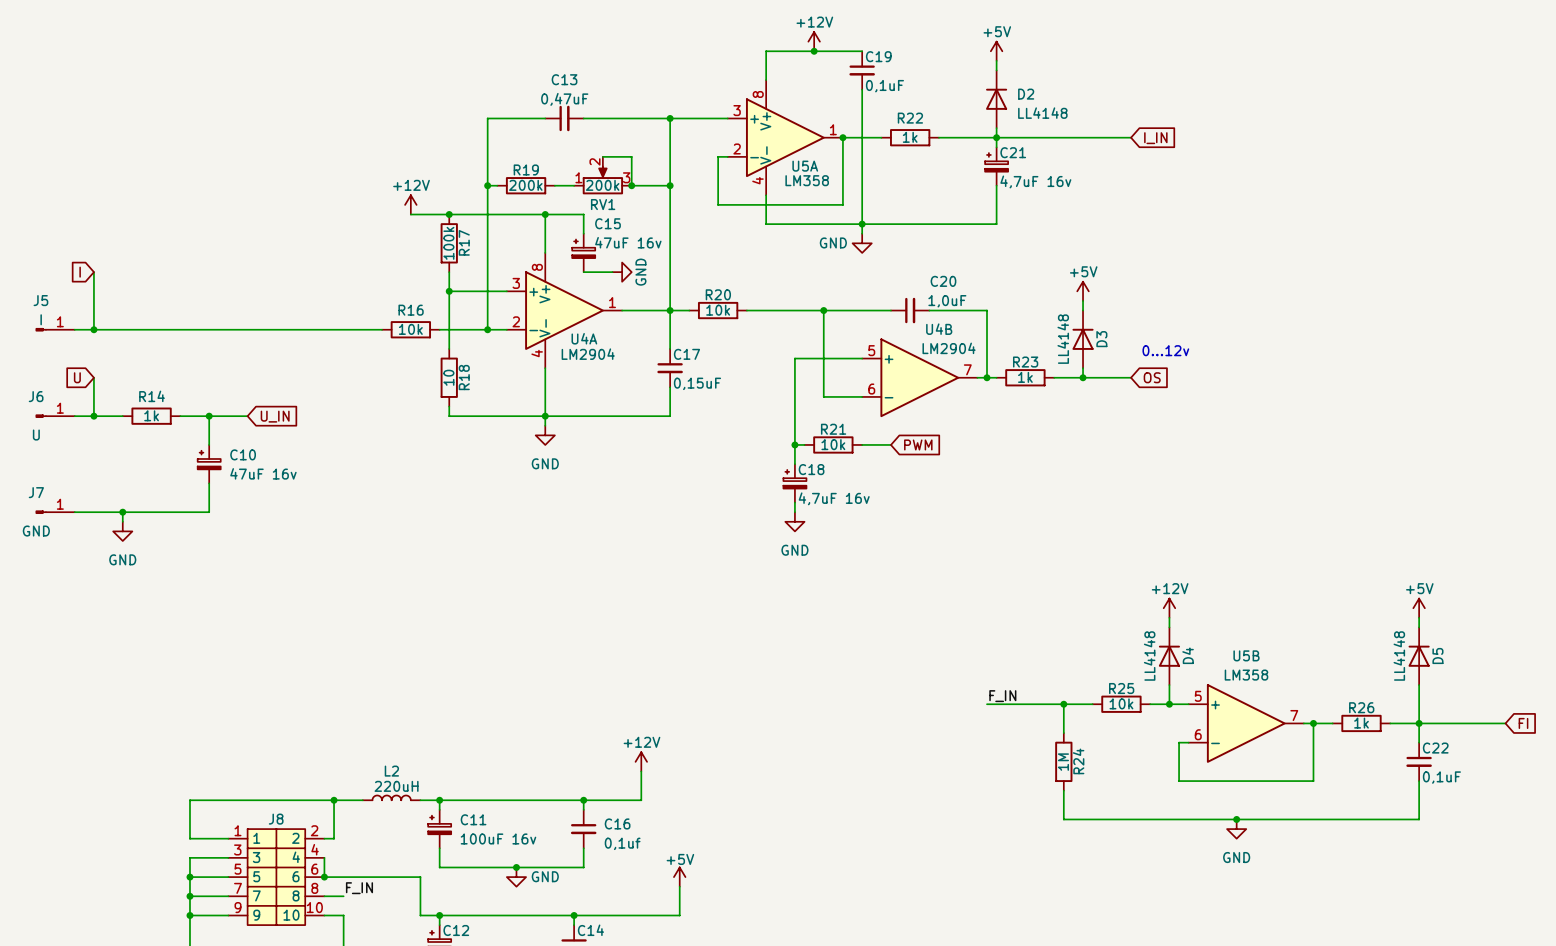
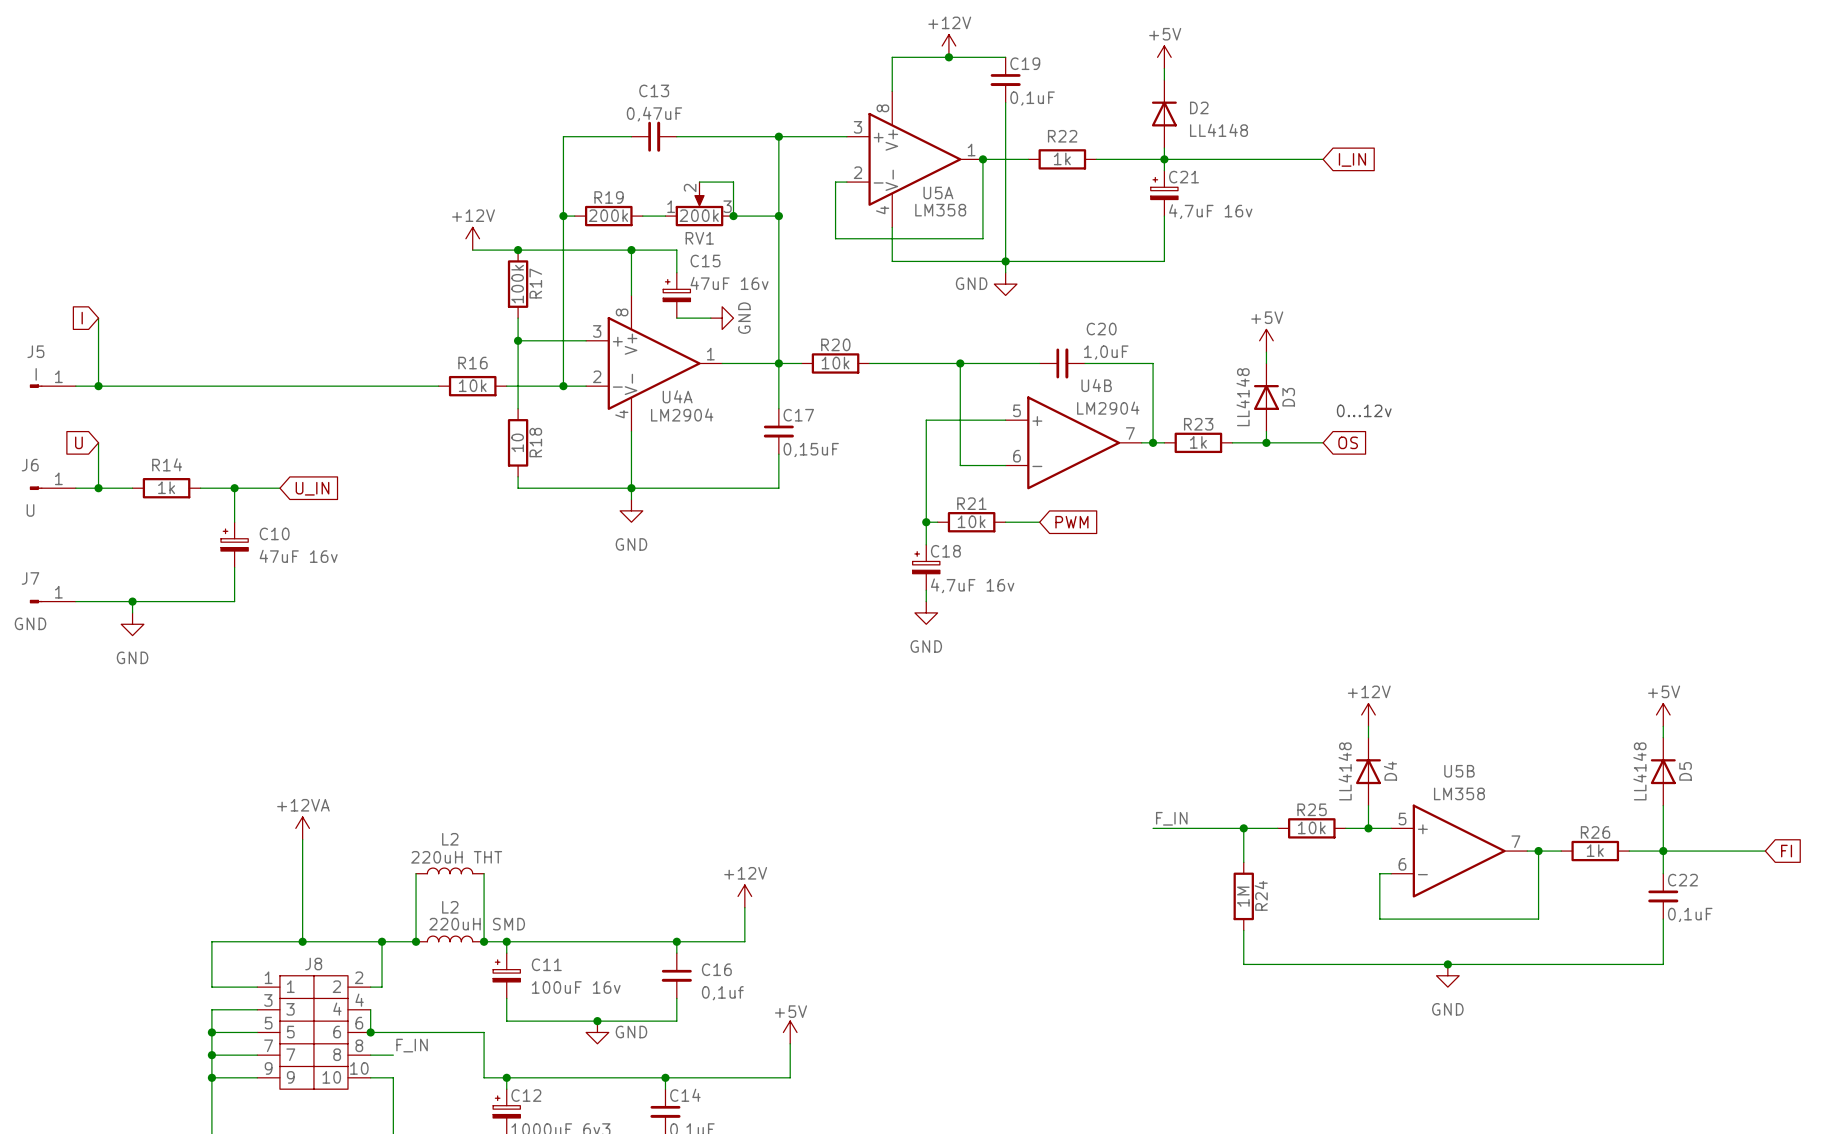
power symbol: none -> +12VA (302, 828)
wire: none -> (302, 839) (302, 941)
L2: none -> 220uH THT (450, 870)
wire: none -> (416, 873) (416, 941)
wire: none -> (484, 873) (484, 941)
L2 value: 220uH (396, 786) -> 220uH SMD (477, 924)
junction: none -> (302, 941)
junction: none -> (416, 941)
junction: none -> (484, 941)

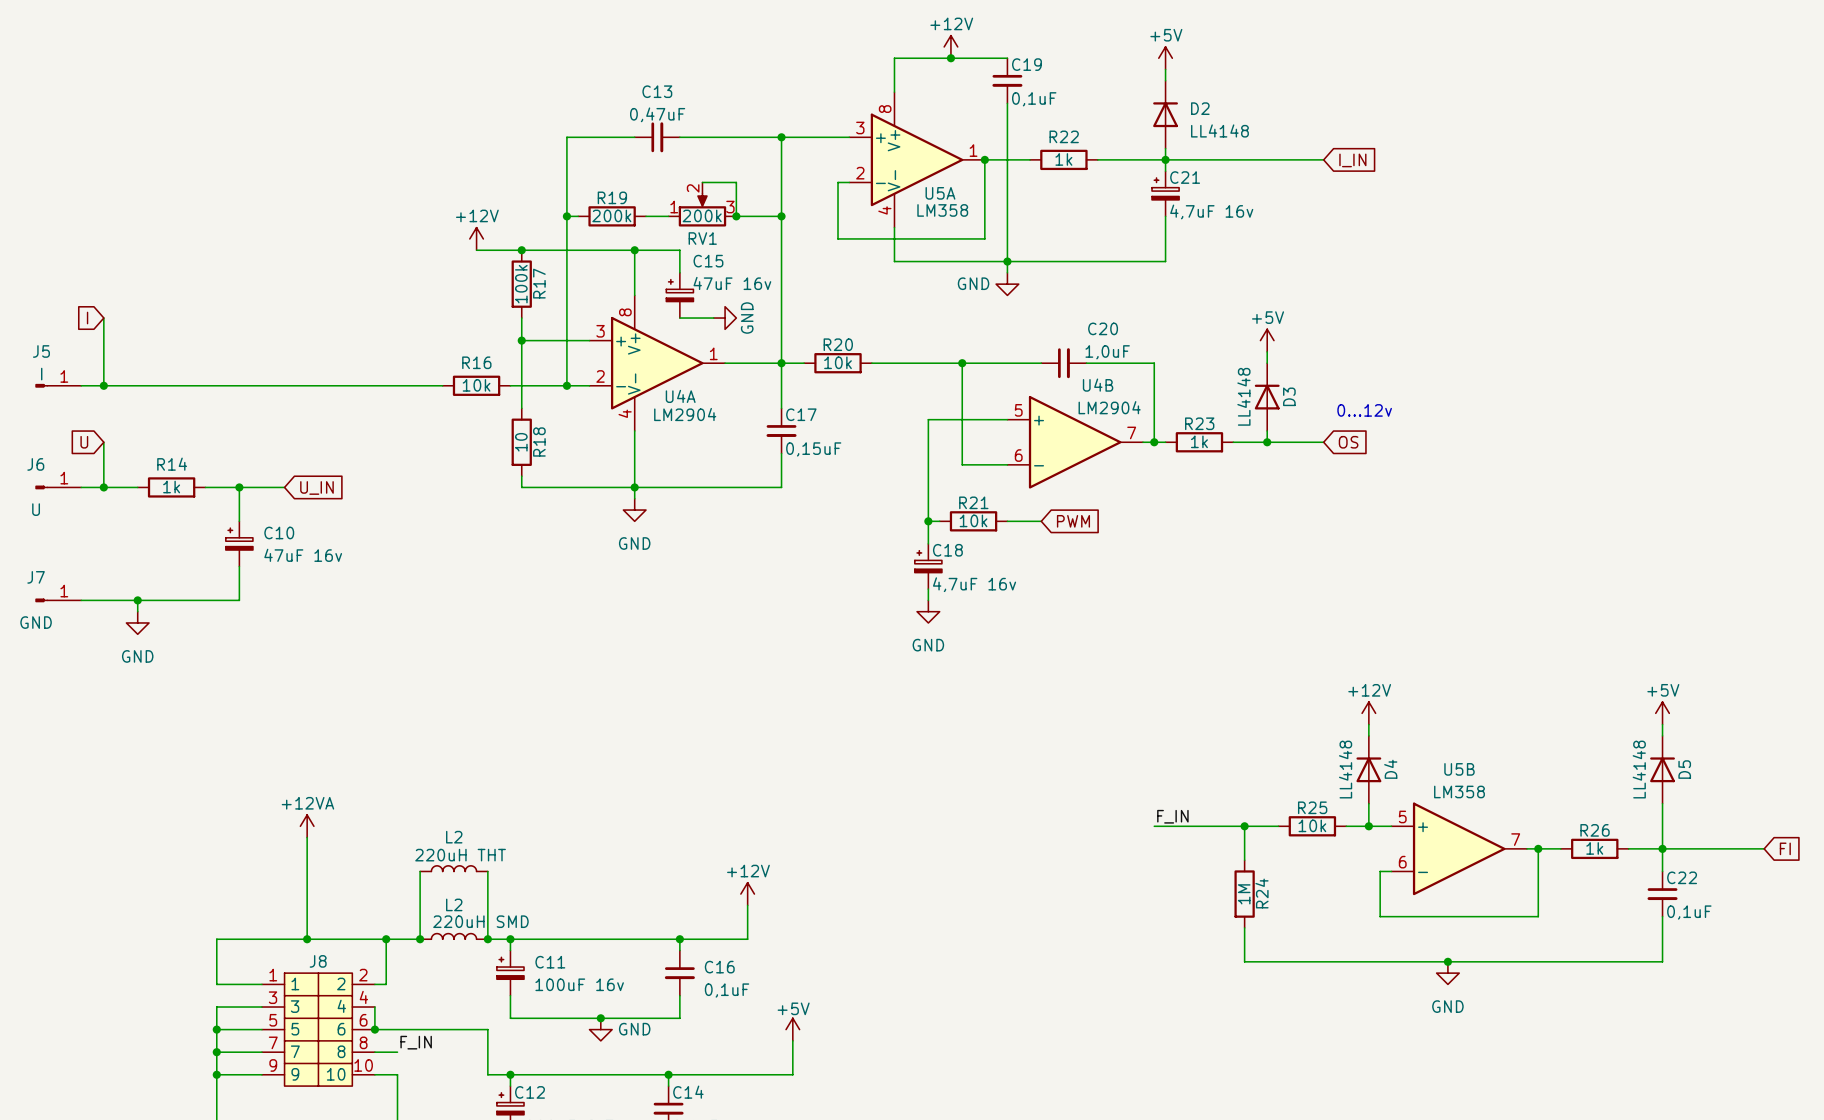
C16 value: 0,1uf (722, 993) -> 0,1uF (727, 990)

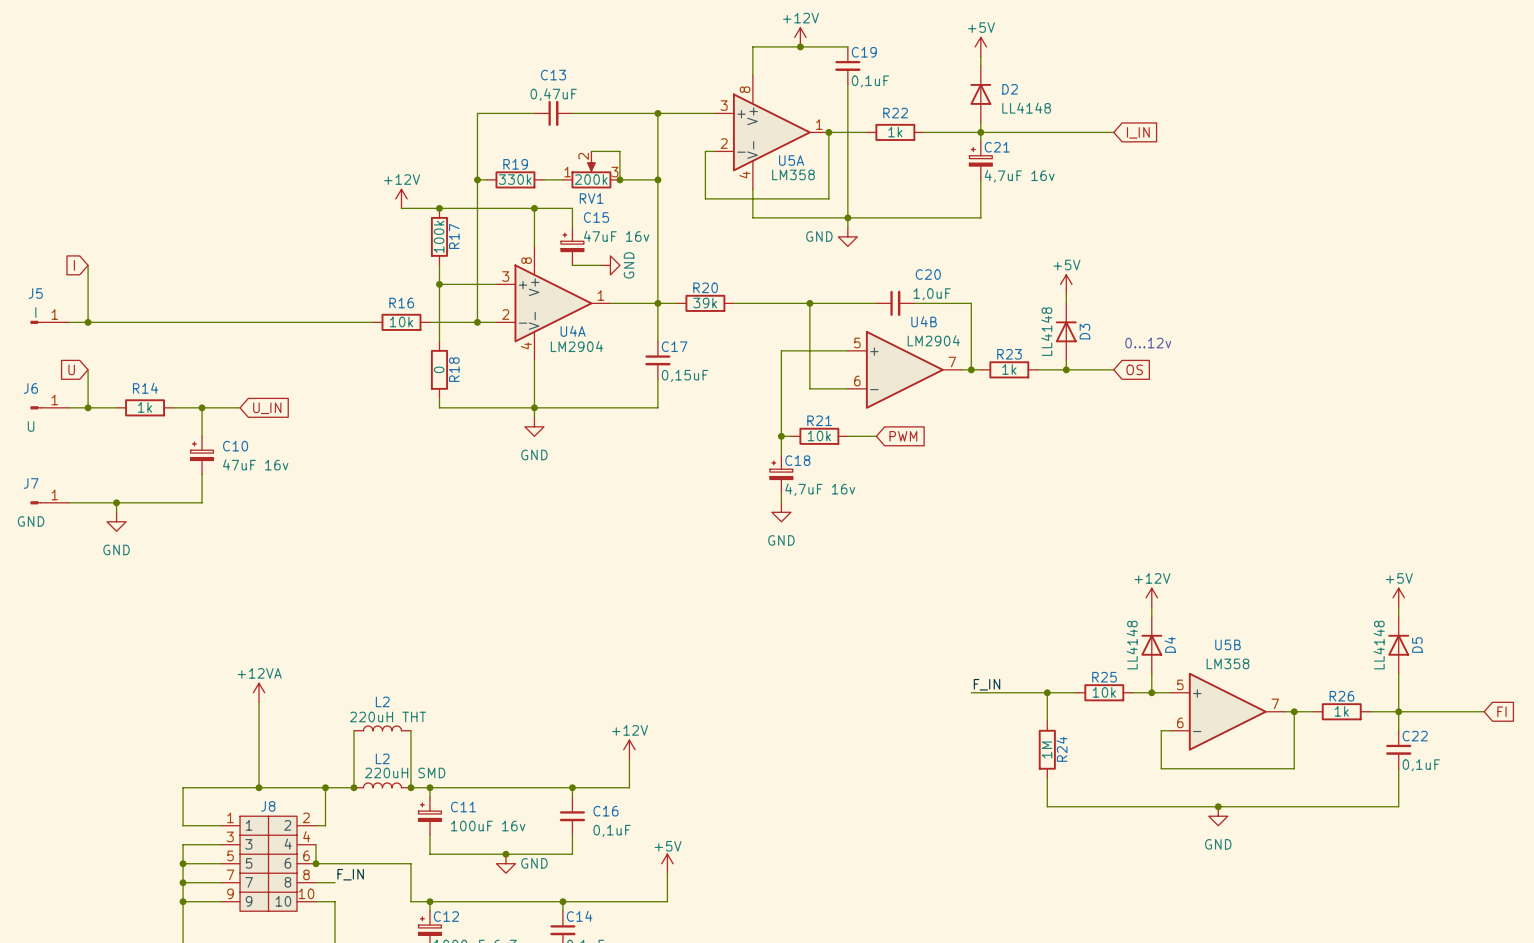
R19 value: 200k (611, 215) -> 330k (515, 179)
R20 value: 10k (838, 362) -> 39k (705, 303)
R18 value: 10 (521, 442) -> 0 (439, 369)

